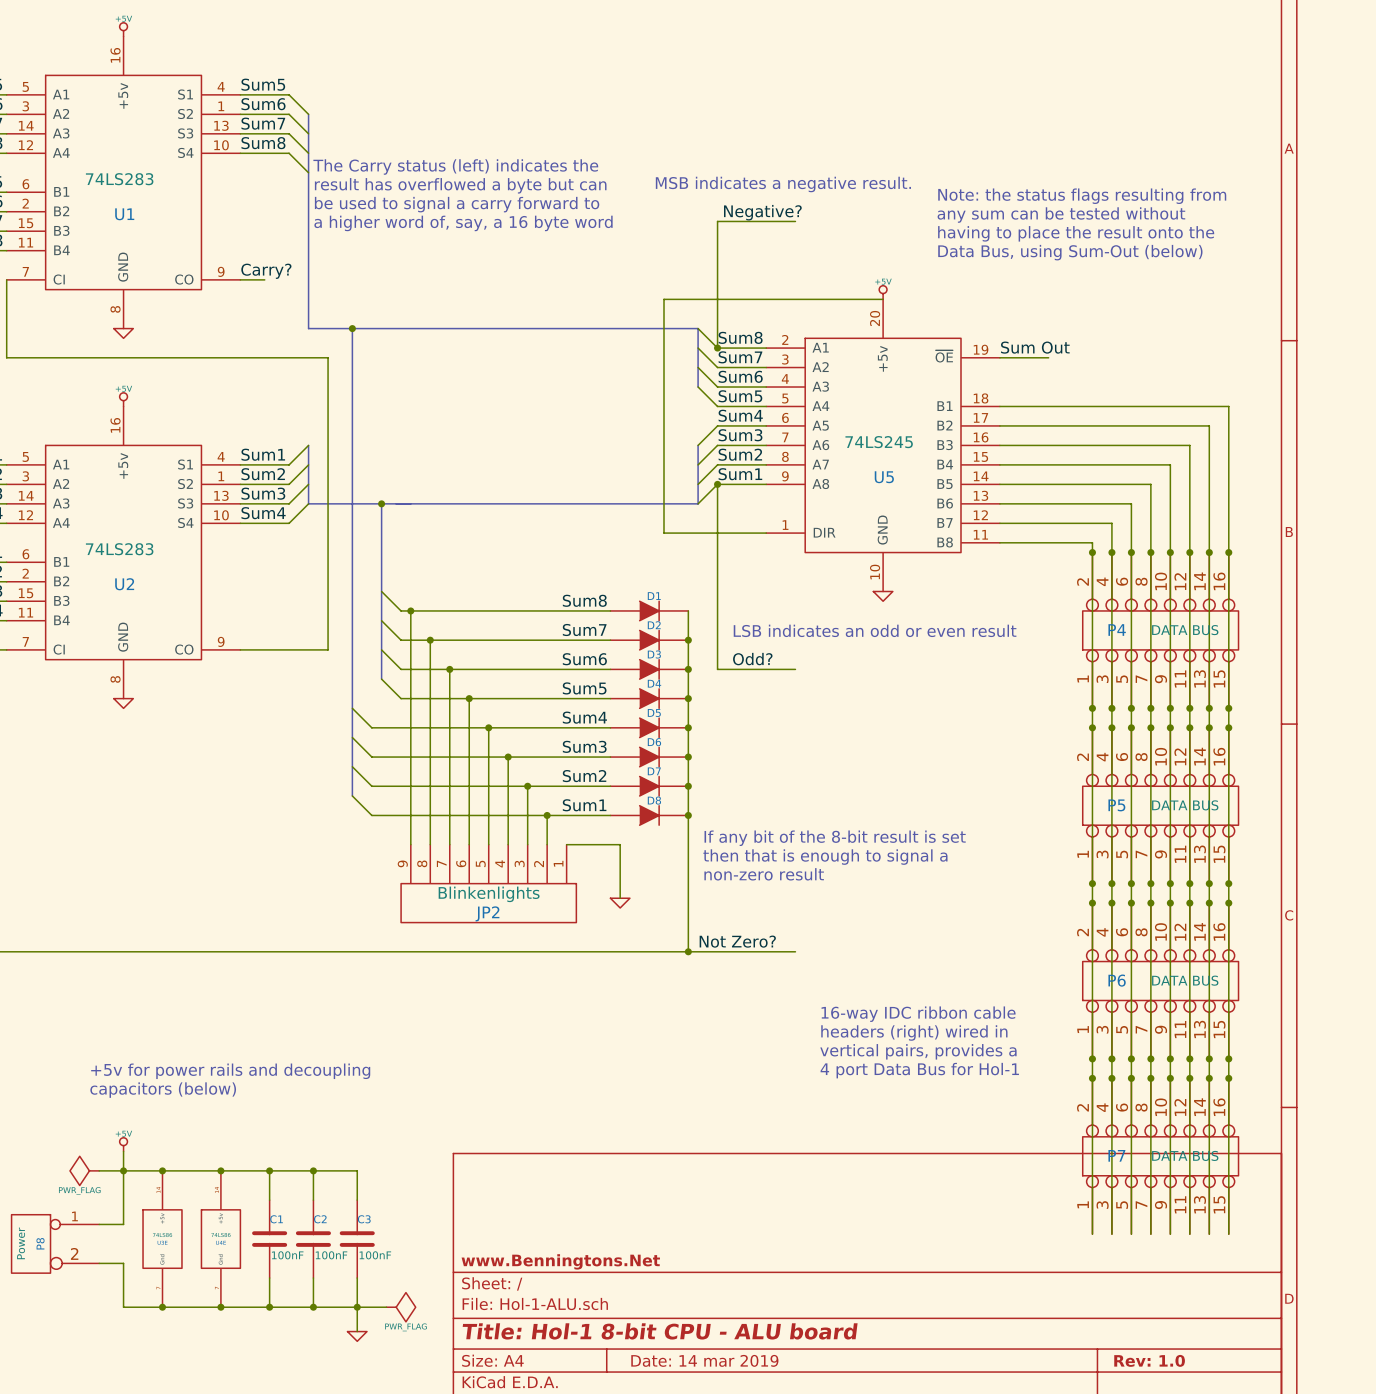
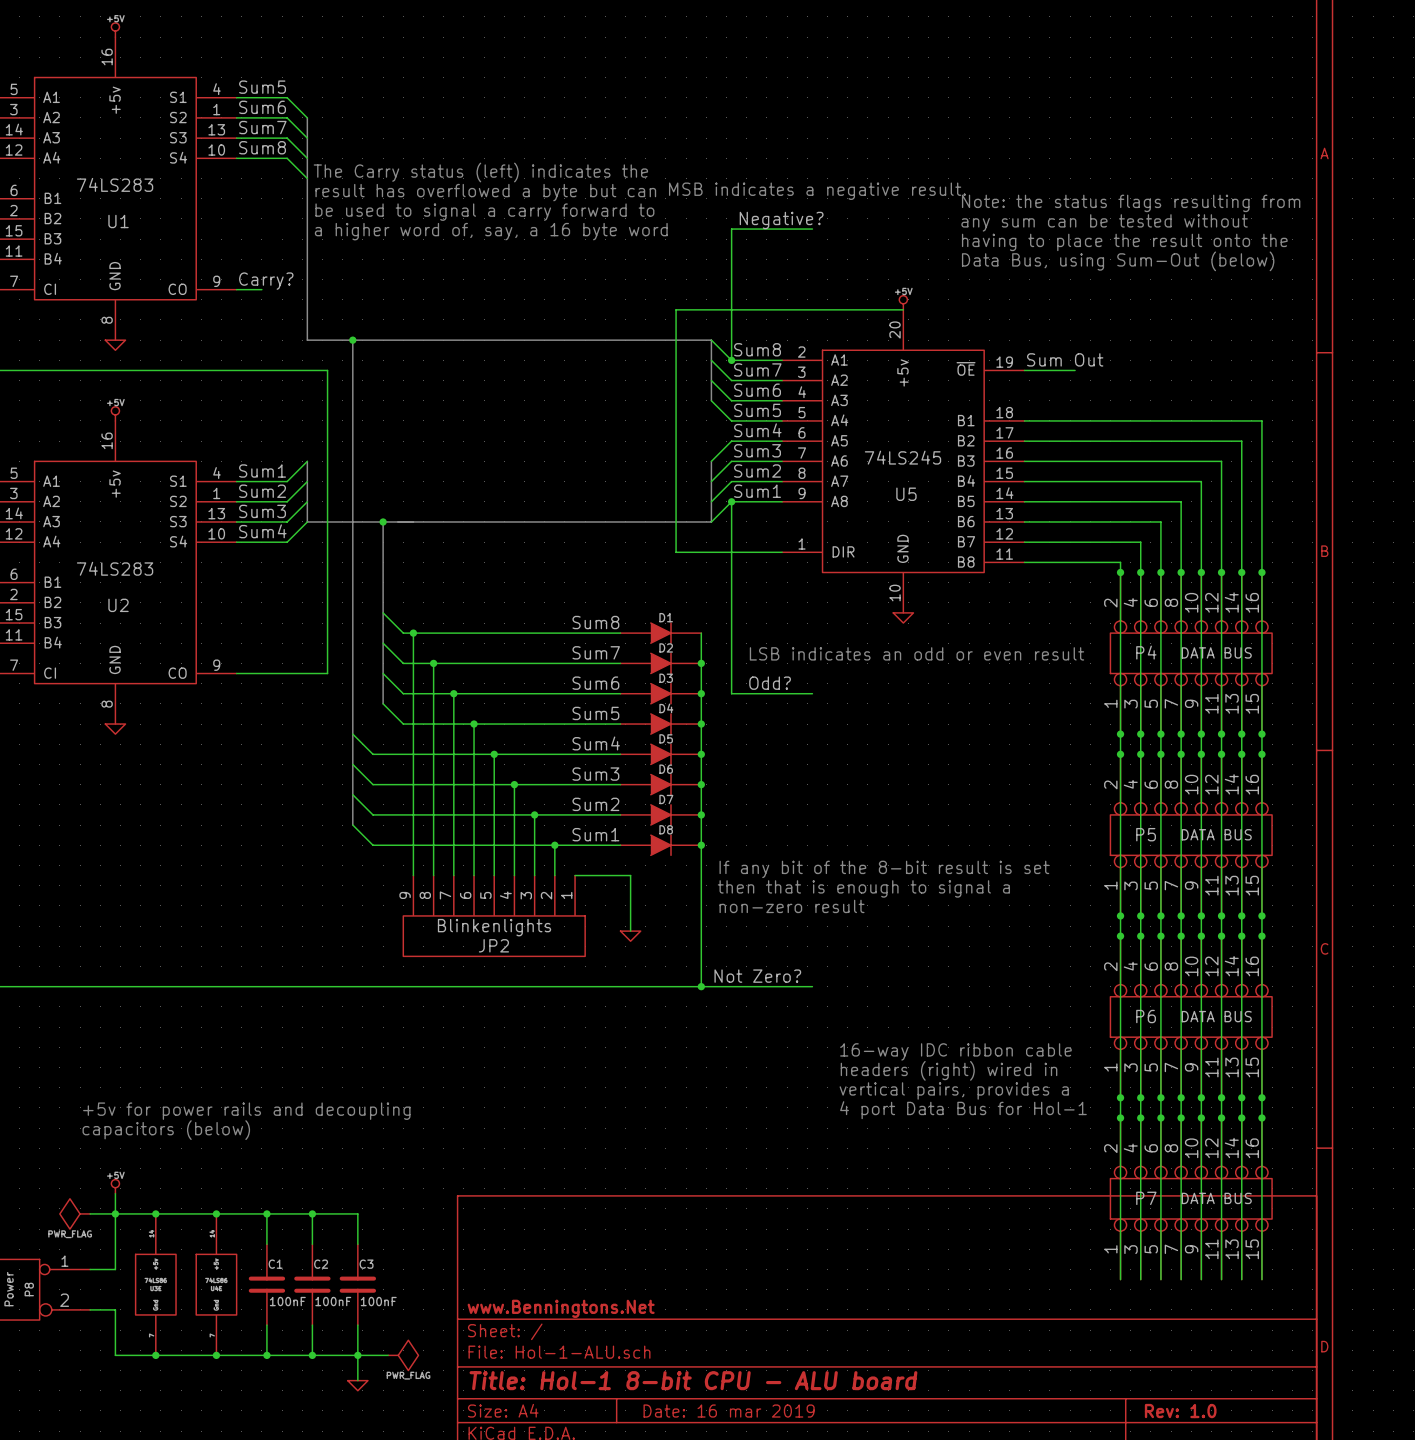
title block: Date: 14 mar 2019 (704, 1360) -> Date: 16 mar 2019 (729, 1411)

